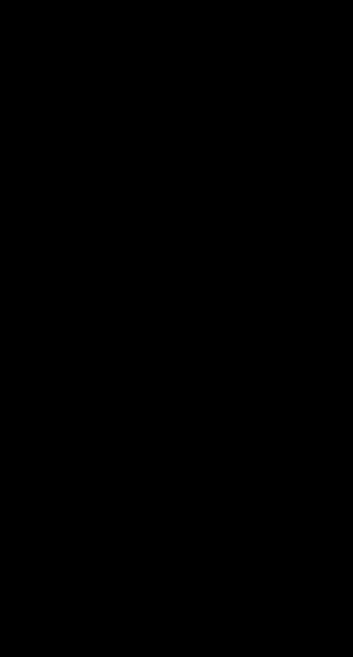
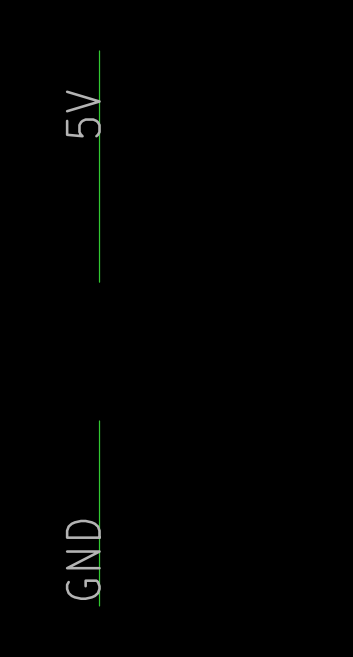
wire: none -> (99, 50) (99, 282)
label: none -> 5V (83, 113)
wire: none -> (99, 420) (99, 605)
label: none -> GND (83, 559)

